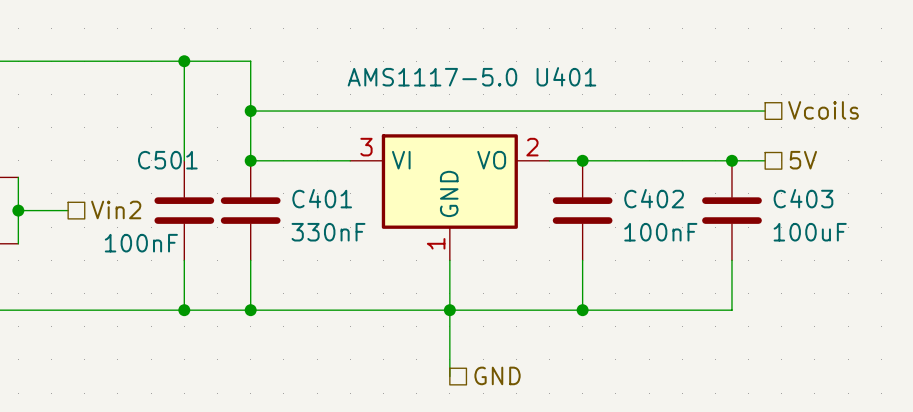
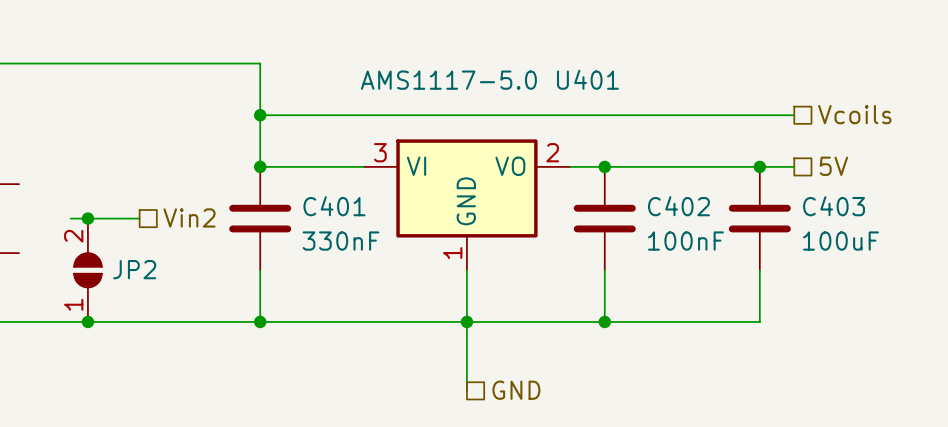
wire: (184, 61) (184, 160) -> none
junction: (184, 61) -> none
wire: (18, 177) (18, 243) -> none
hierarchical label position: Vin2 (116, 209) -> Vin2 (189, 217)
wire: (18, 210) (68, 210) -> (139, 218) (70, 218)
junction: (18, 210) -> none
junction: none -> (87, 218)
C501: 100nF (184, 210) -> none
JP2: none -> (87, 270)
wire: (184, 260) (184, 310) -> none
junction: none -> (87, 321)
junction: (184, 310) -> none

